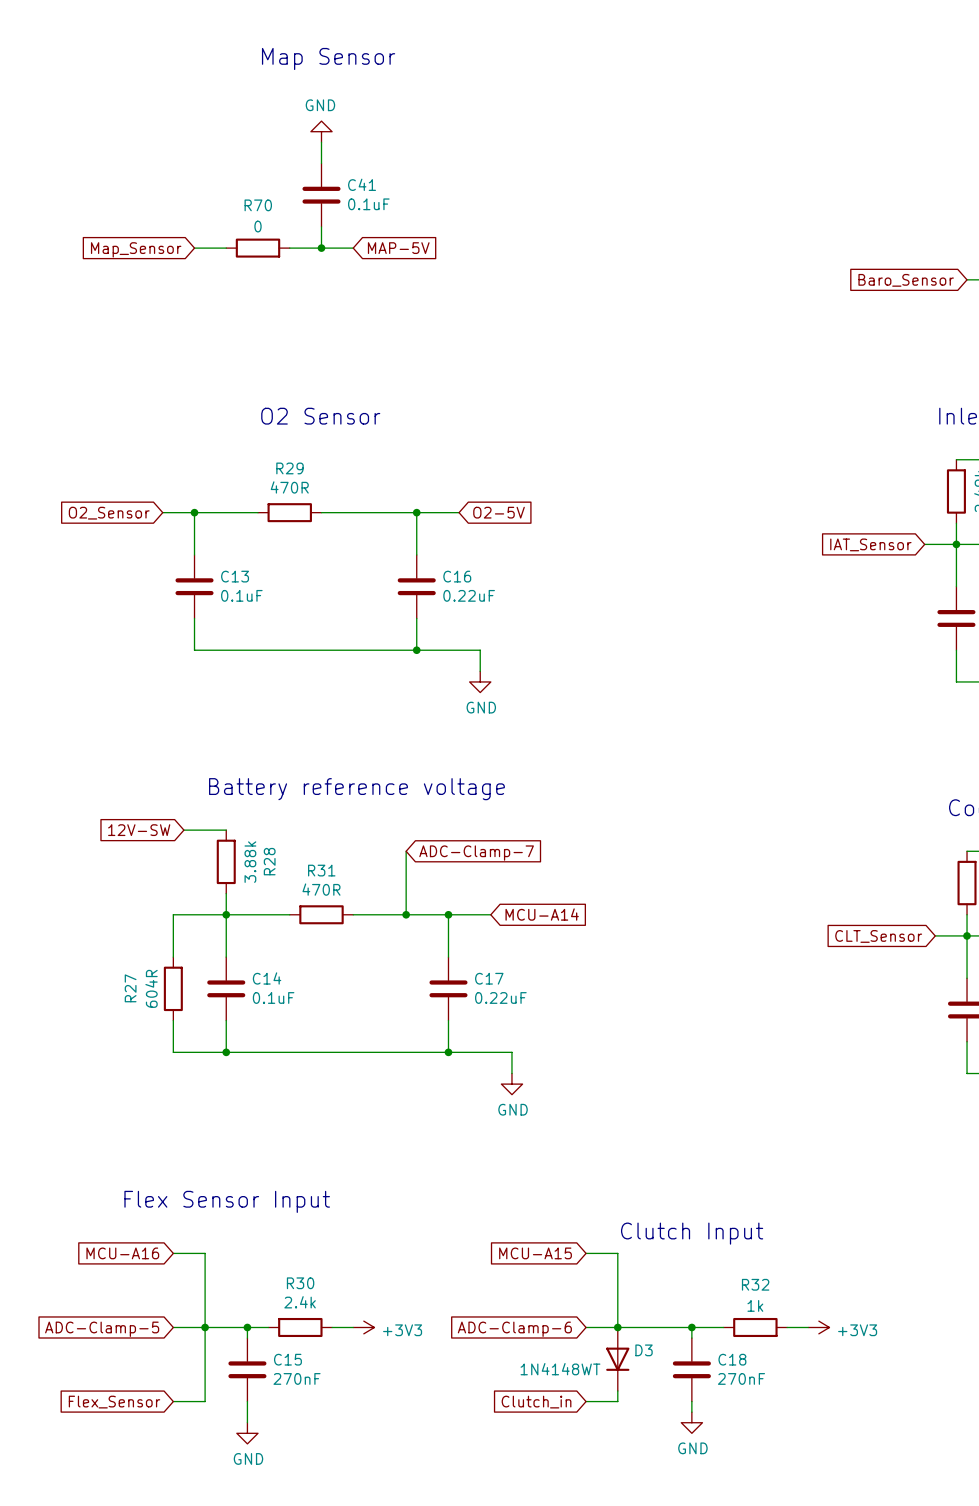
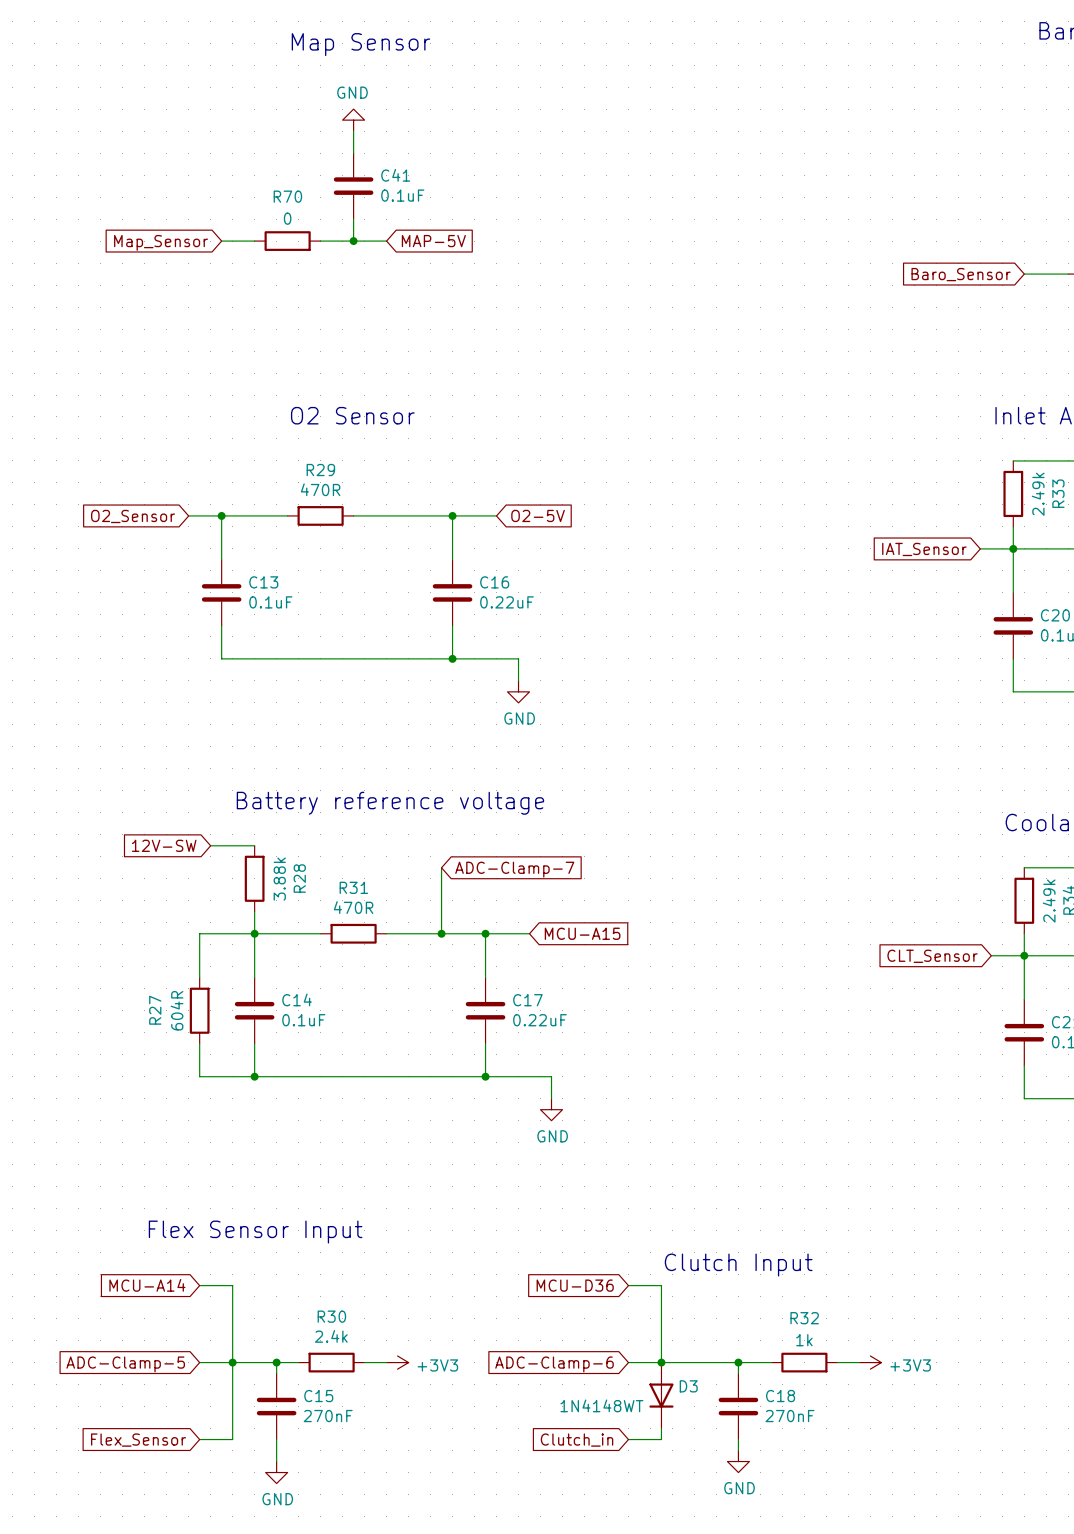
global label: MCU-A14 (542, 914) -> MCU-A15 (582, 933)
global label: MCU-A16 (122, 1253) -> MCU-A14 (147, 1285)
global label: MCU-A15 (535, 1253) -> MCU-D36 (575, 1285)

